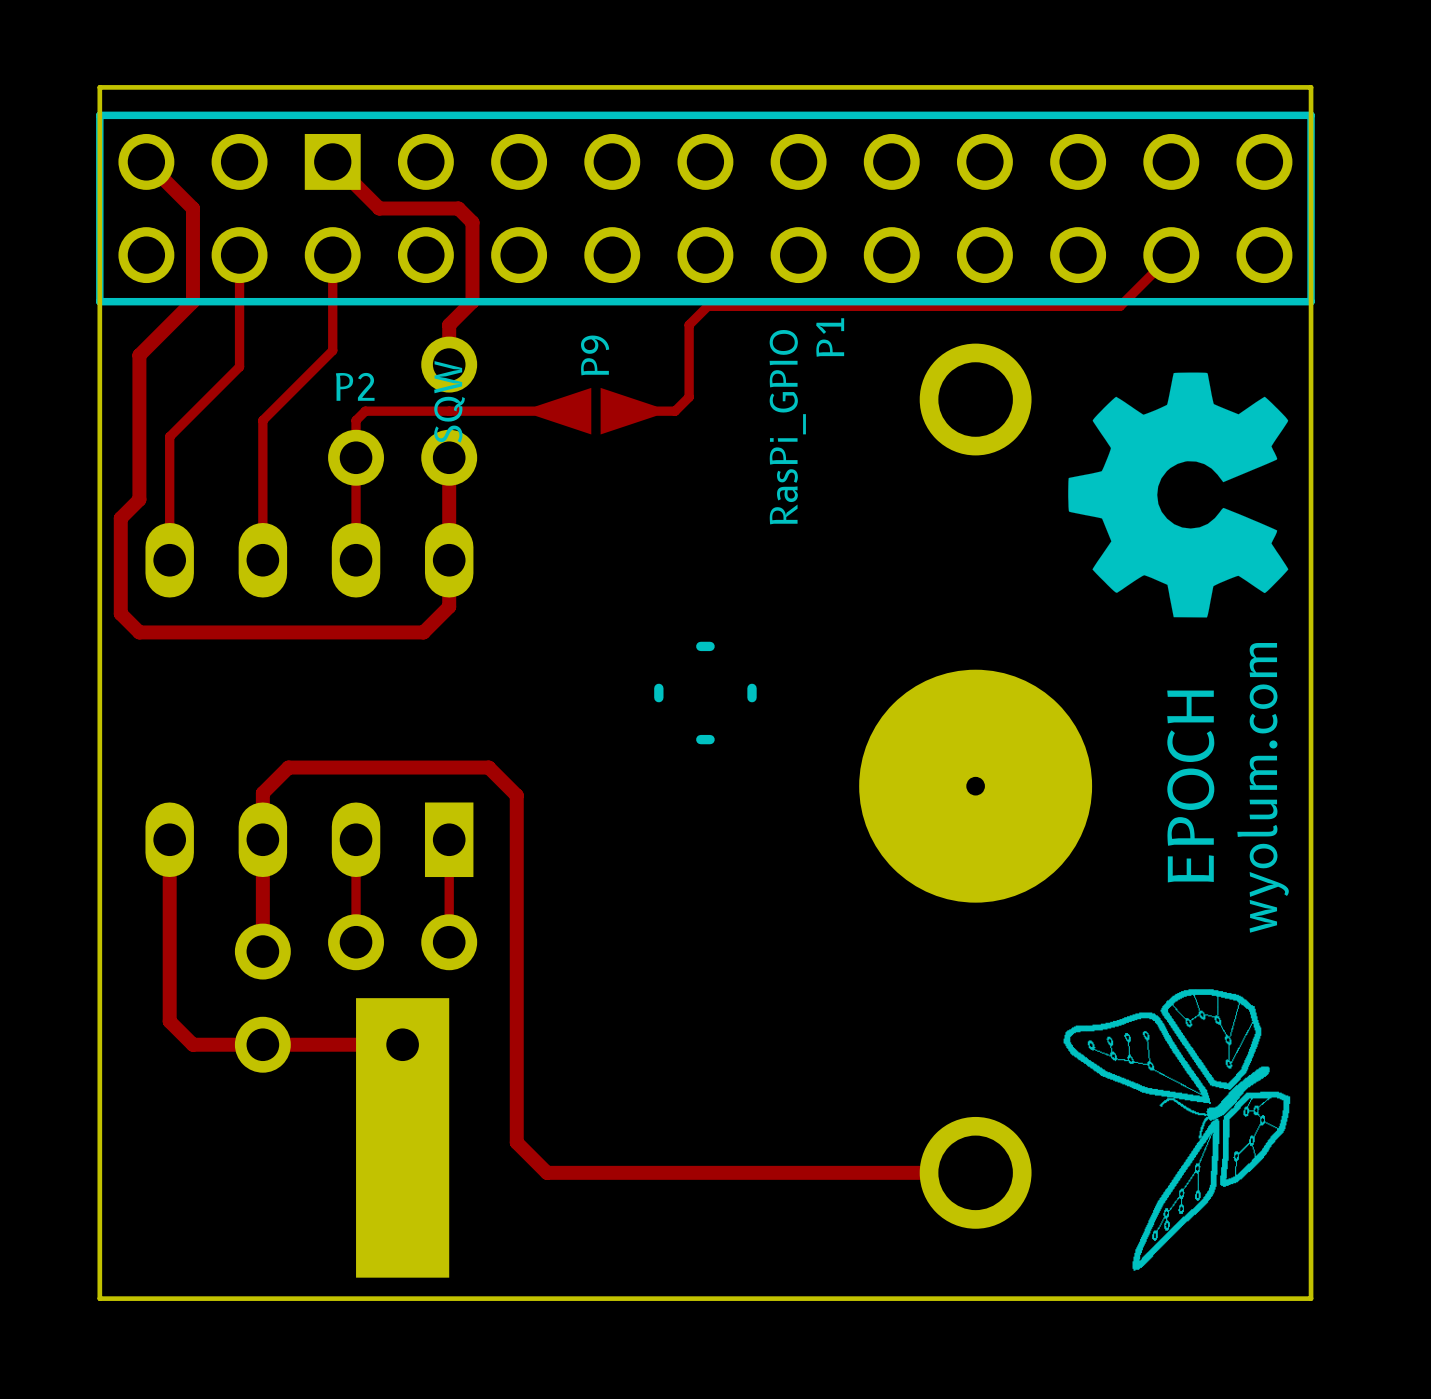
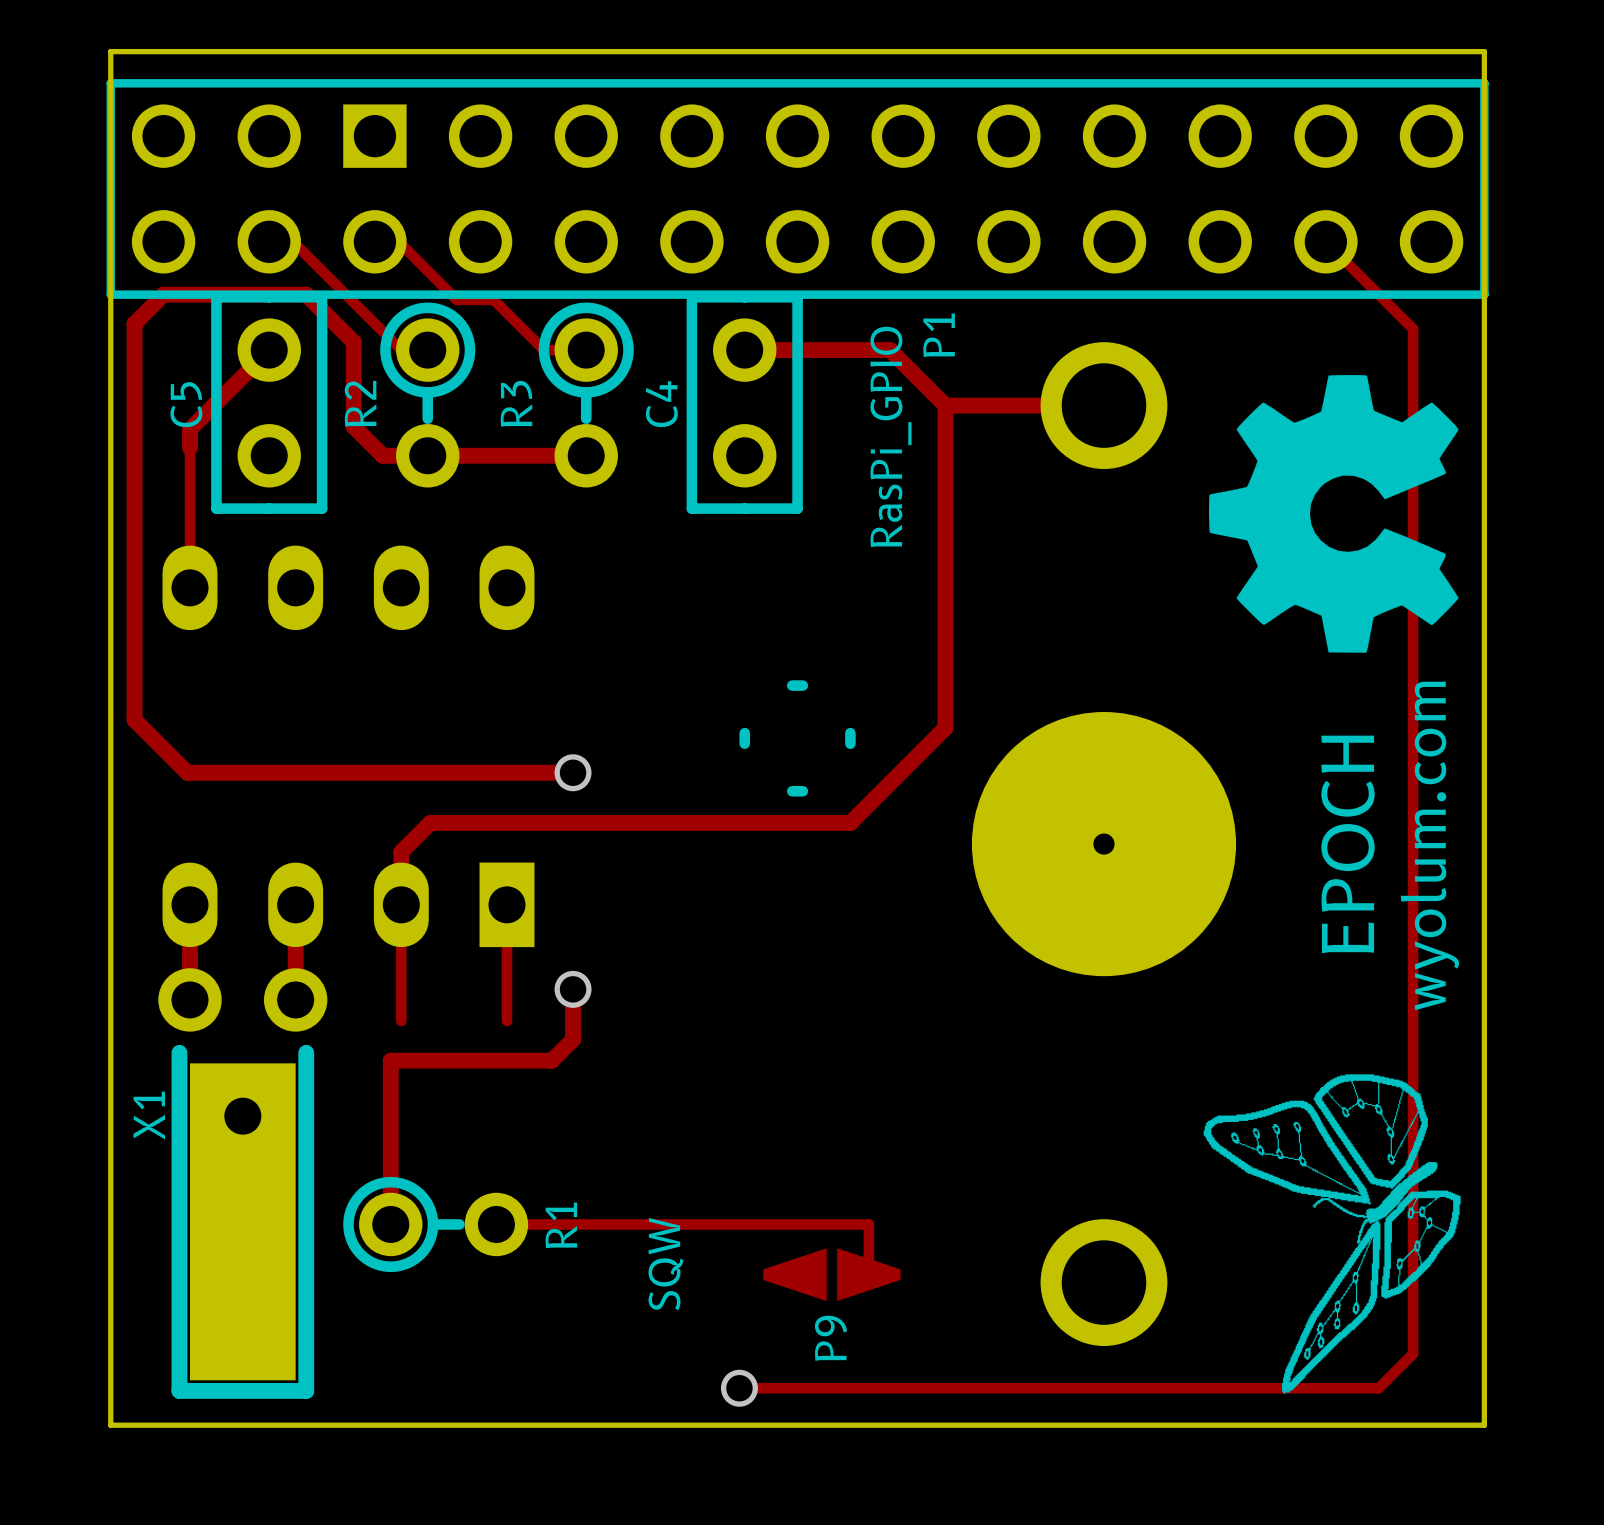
track: (146, 161) (192, 208) (192, 301) (139, 355) (139, 499) (120, 518) -> (586, 455) (382, 455) (353, 426) (353, 342) (306, 294) (163, 294) (134, 323) (134, 540)
track: (332, 161) (379, 208) (458, 208) (472, 222) (472, 301) (449, 324) (449, 364) -> none
track: (239, 255) (239, 366) (169, 436) -> (269, 350) (190, 429) (190, 447)
track: none -> (269, 241) (293, 241) (401, 350) (427, 350)
track: (332, 255) (332, 350) (262, 420) (262, 560) -> (374, 241) (398, 241) (456, 299) (493, 299) (543, 350) (586, 350)
track: (1171, 255) (1120, 306) (707, 306) (689, 324) (689, 397) (675, 411) (628, 411) -> (1325, 241) (1413, 328) (1413, 1353) (1378, 1388) (739, 1388)
track: none -> (744, 350) (890, 350) (945, 405)
P9 name position: P9 (595, 355) -> P9 (830, 1338)
R2: none -> (427, 395)
R3: none -> (586, 395)
track: none -> (945, 405) (1103, 405)
C5 side: bottom (449, 411) -> top (269, 402)
track: (563, 411) (365, 411) (356, 420) (356, 560) -> none
P9 position: (595, 411) -> (831, 1274)
P2: (356, 457) -> none
track: (449, 457) (449, 606) (423, 632) (139, 632) (120, 613) -> (573, 772) (187, 772) (134, 719) (134, 648)
via: none -> (573, 772)
track: (381, 767) (288, 767) (262, 793) (262, 839) -> (430, 822) (401, 852) (401, 904)
track: (488, 767) (516, 795) (516, 1142) (547, 1172) (975, 1172) -> (551, 822) (850, 822) (945, 727) (945, 405)
track: none -> (573, 989) (573, 1039) (551, 1060) (390, 1060) (390, 1224)
via: none -> (573, 989)
track: (169, 923) (169, 1021) (192, 1044) (402, 1044) -> none
C4 side: bottom (262, 998) -> top (744, 402)
X1 side: bottom (402, 1095) -> top (242, 1183)
R1: none -> (435, 1224)
track: none -> (496, 1224) (868, 1224) (868, 1274)
via: none -> (739, 1388)

